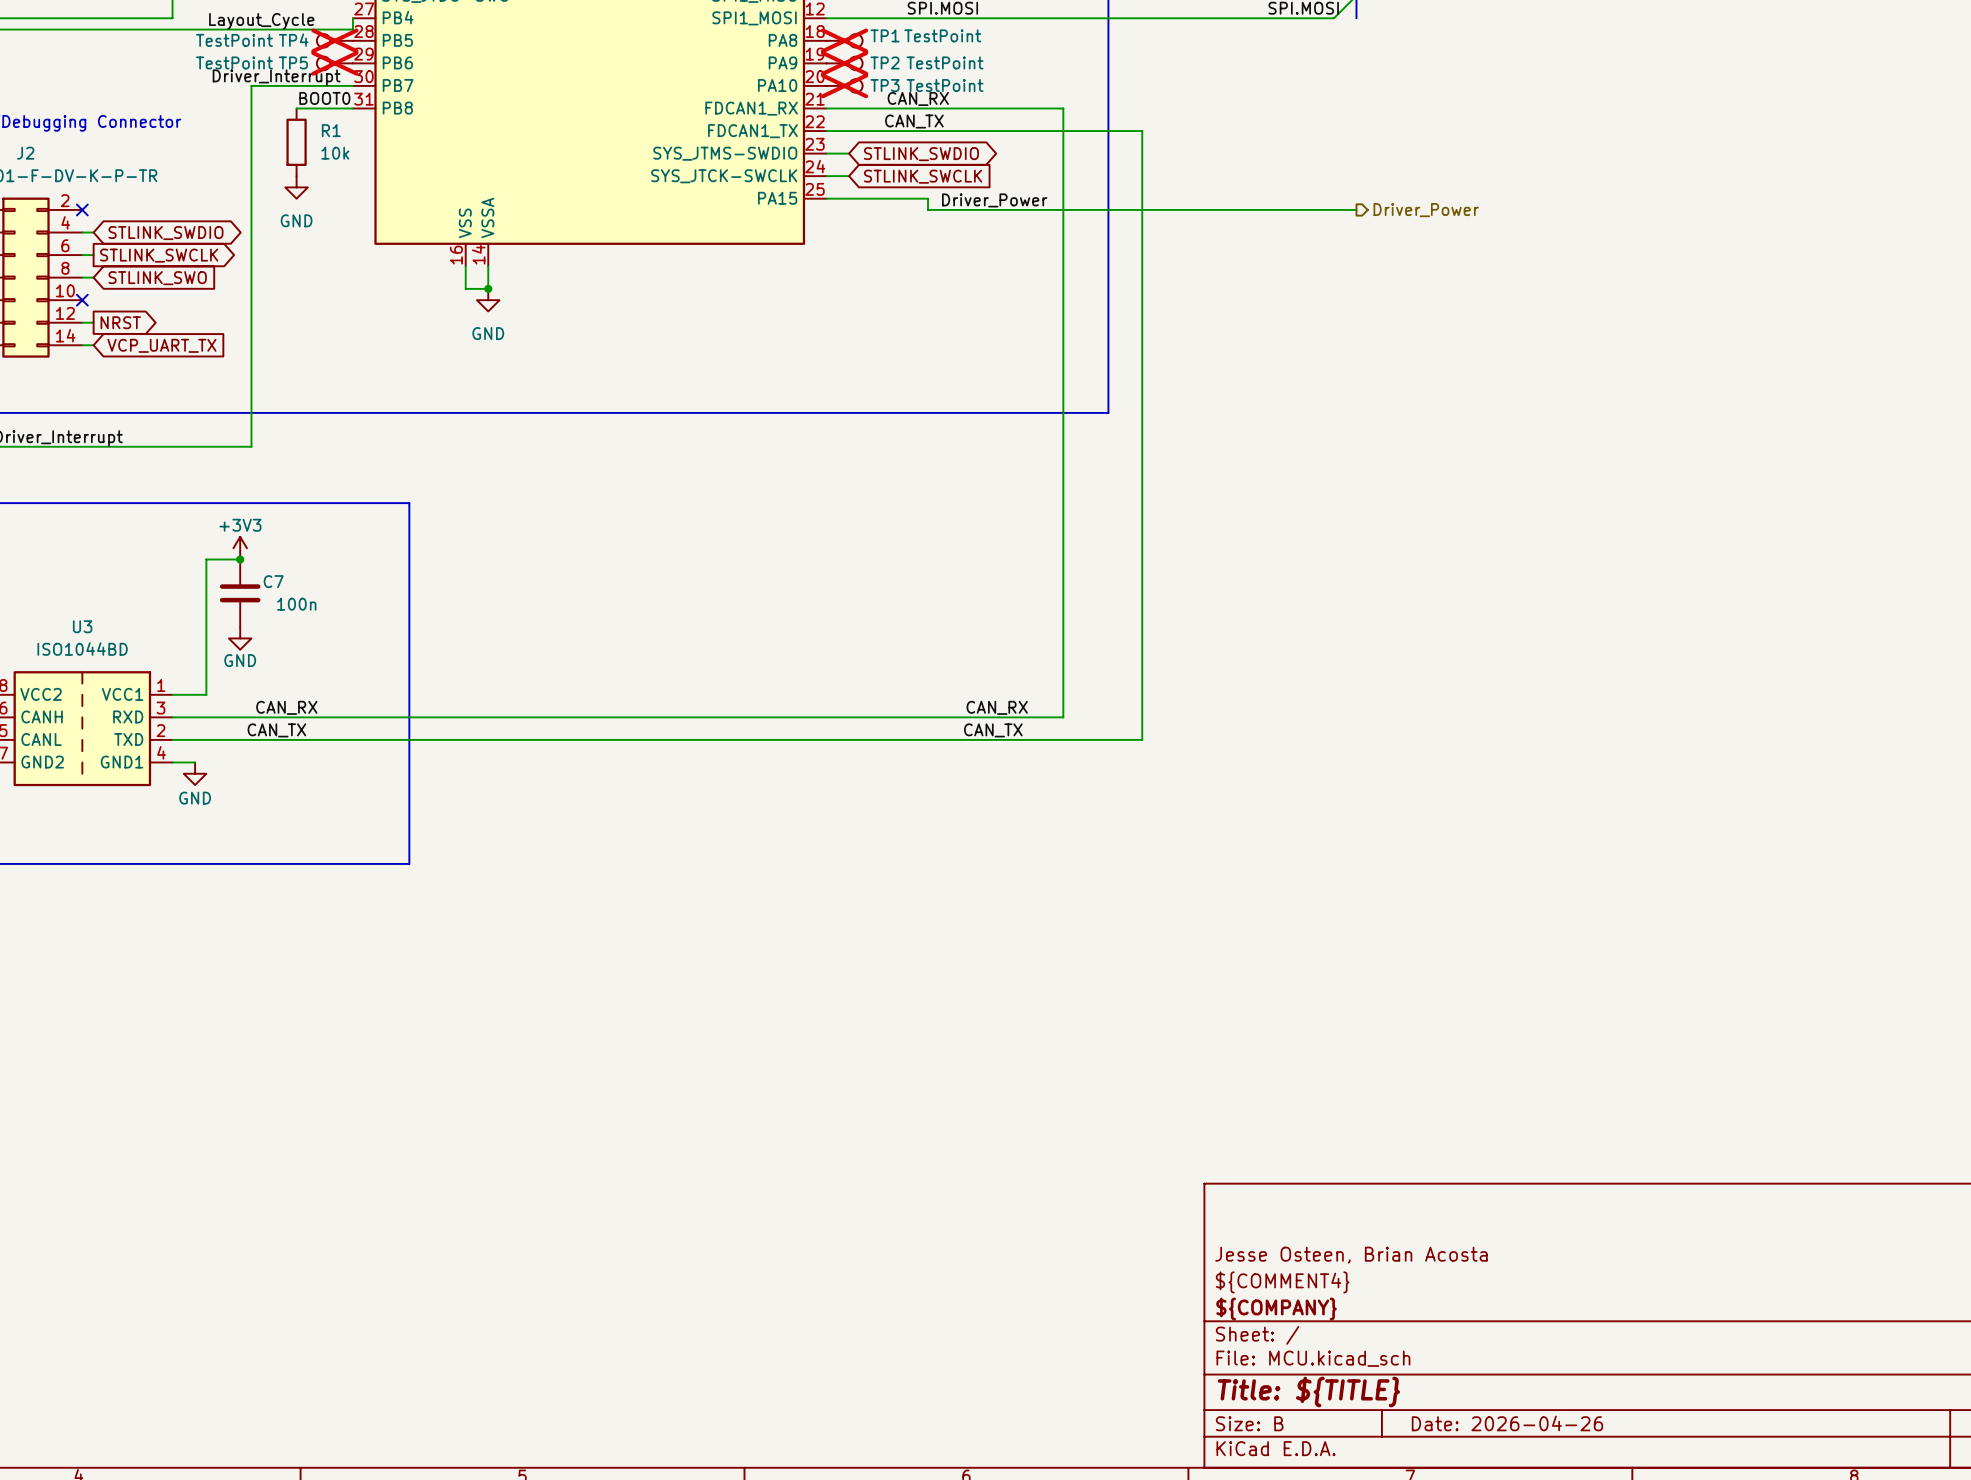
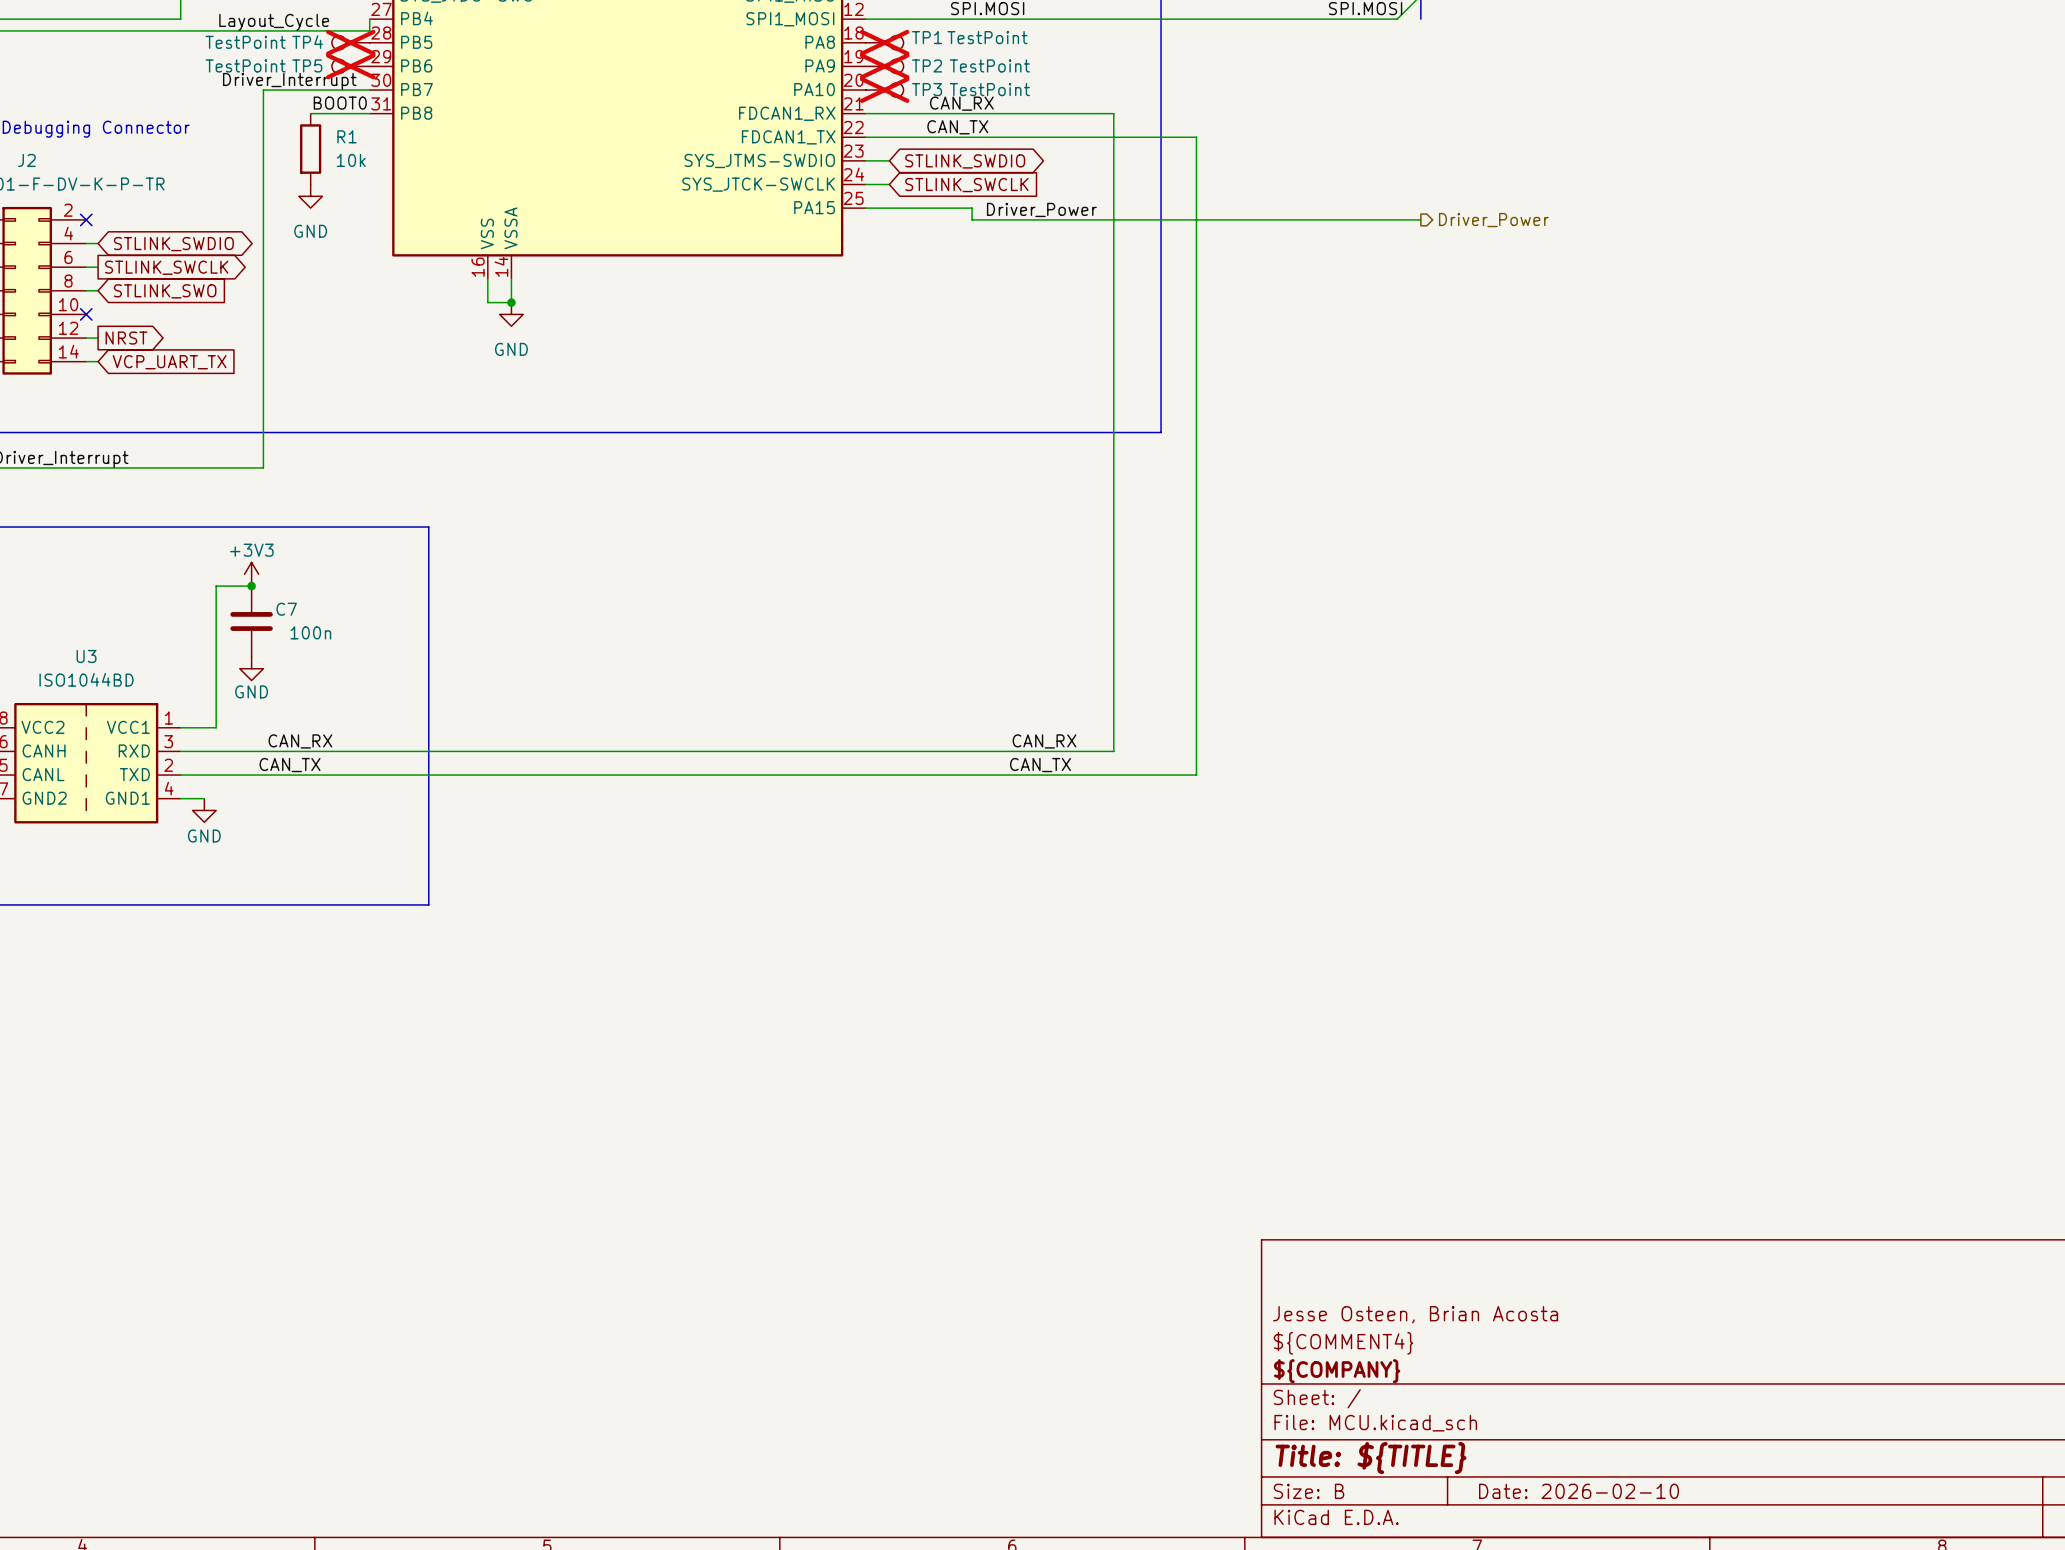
title block: Date: 2026-04-26 (1507, 1423) -> Date: 2026-02-10 (1579, 1491)

